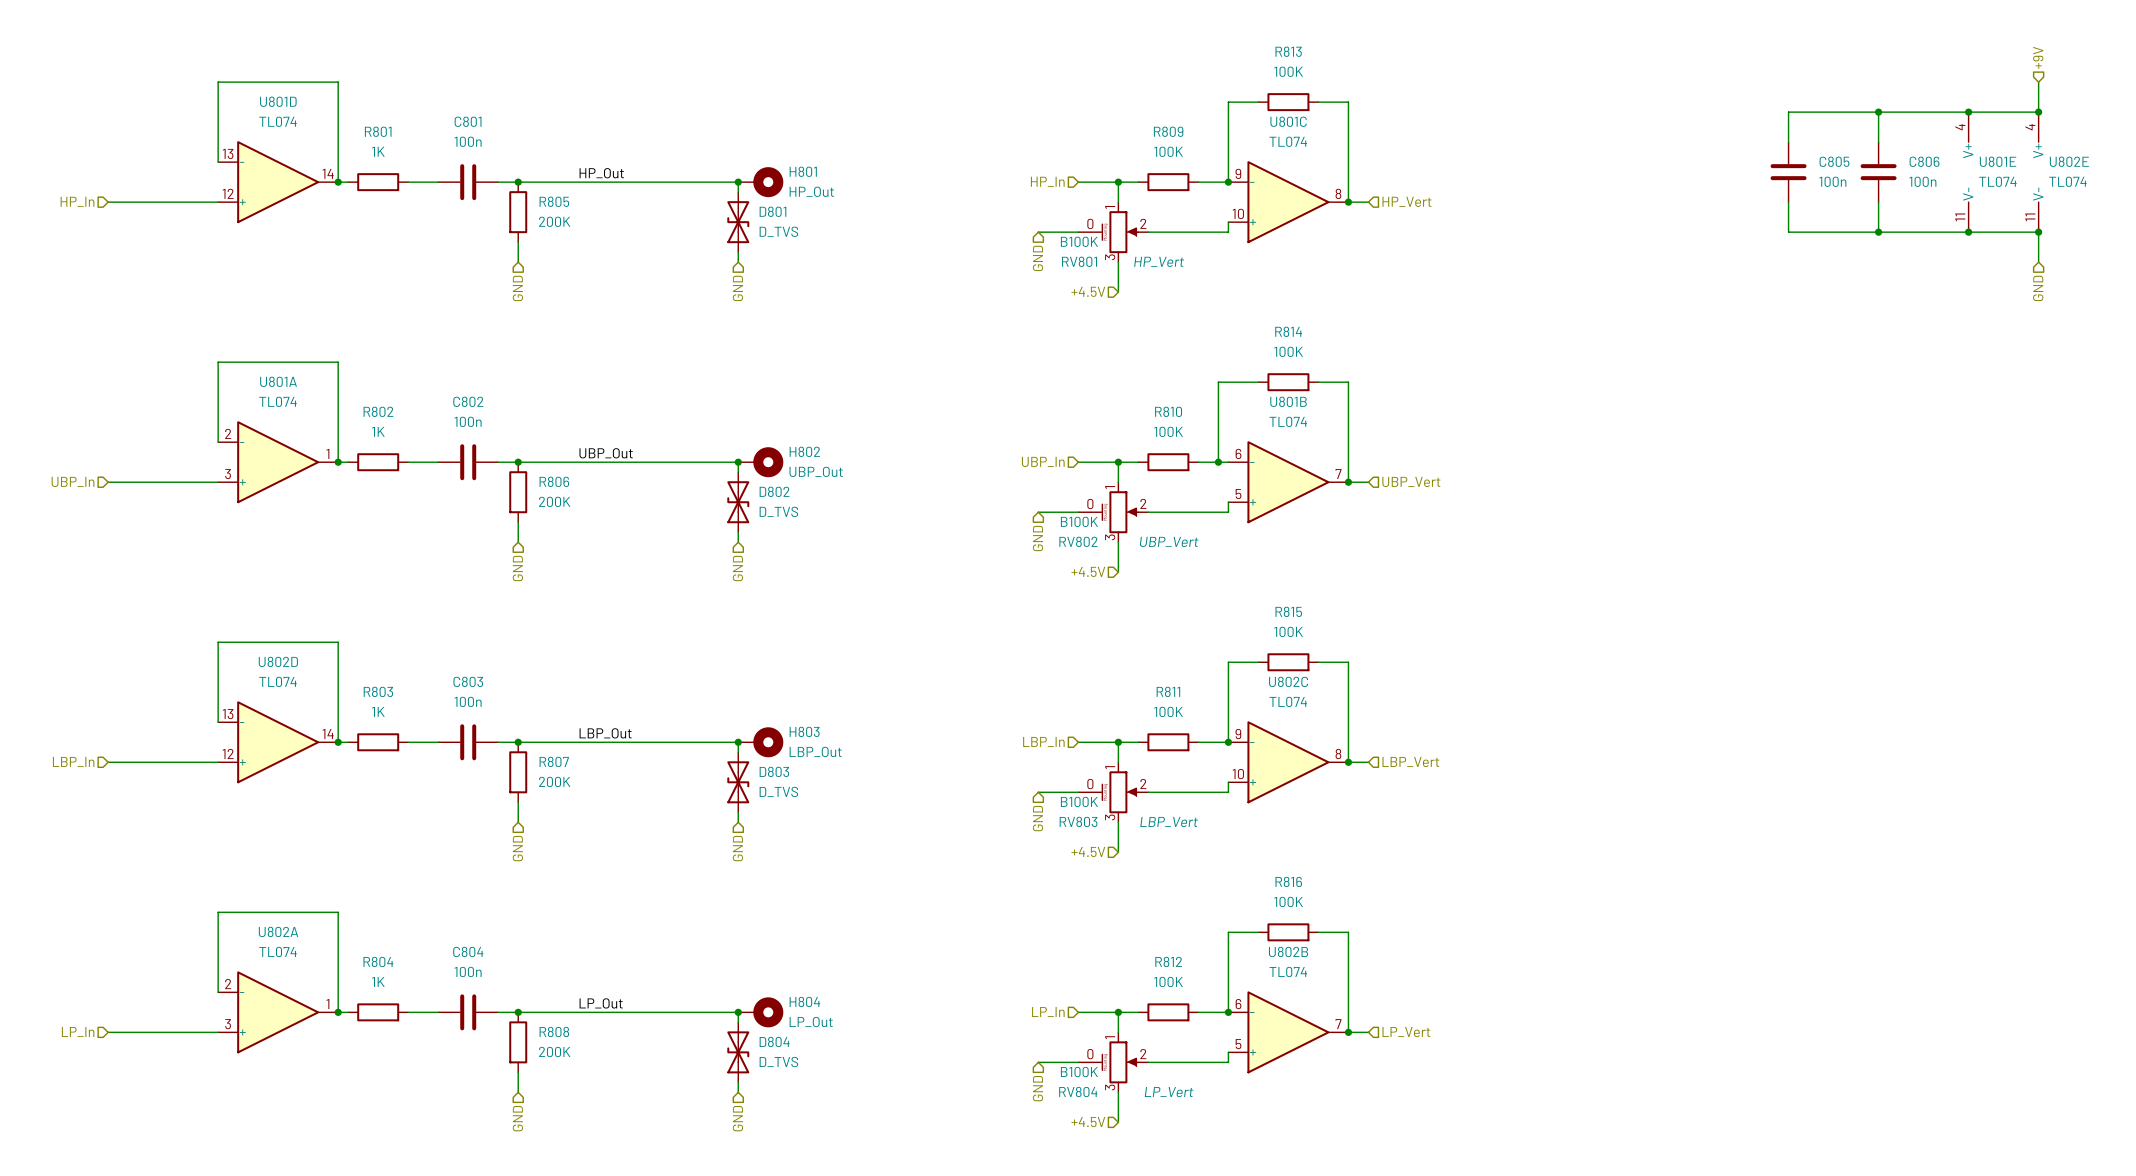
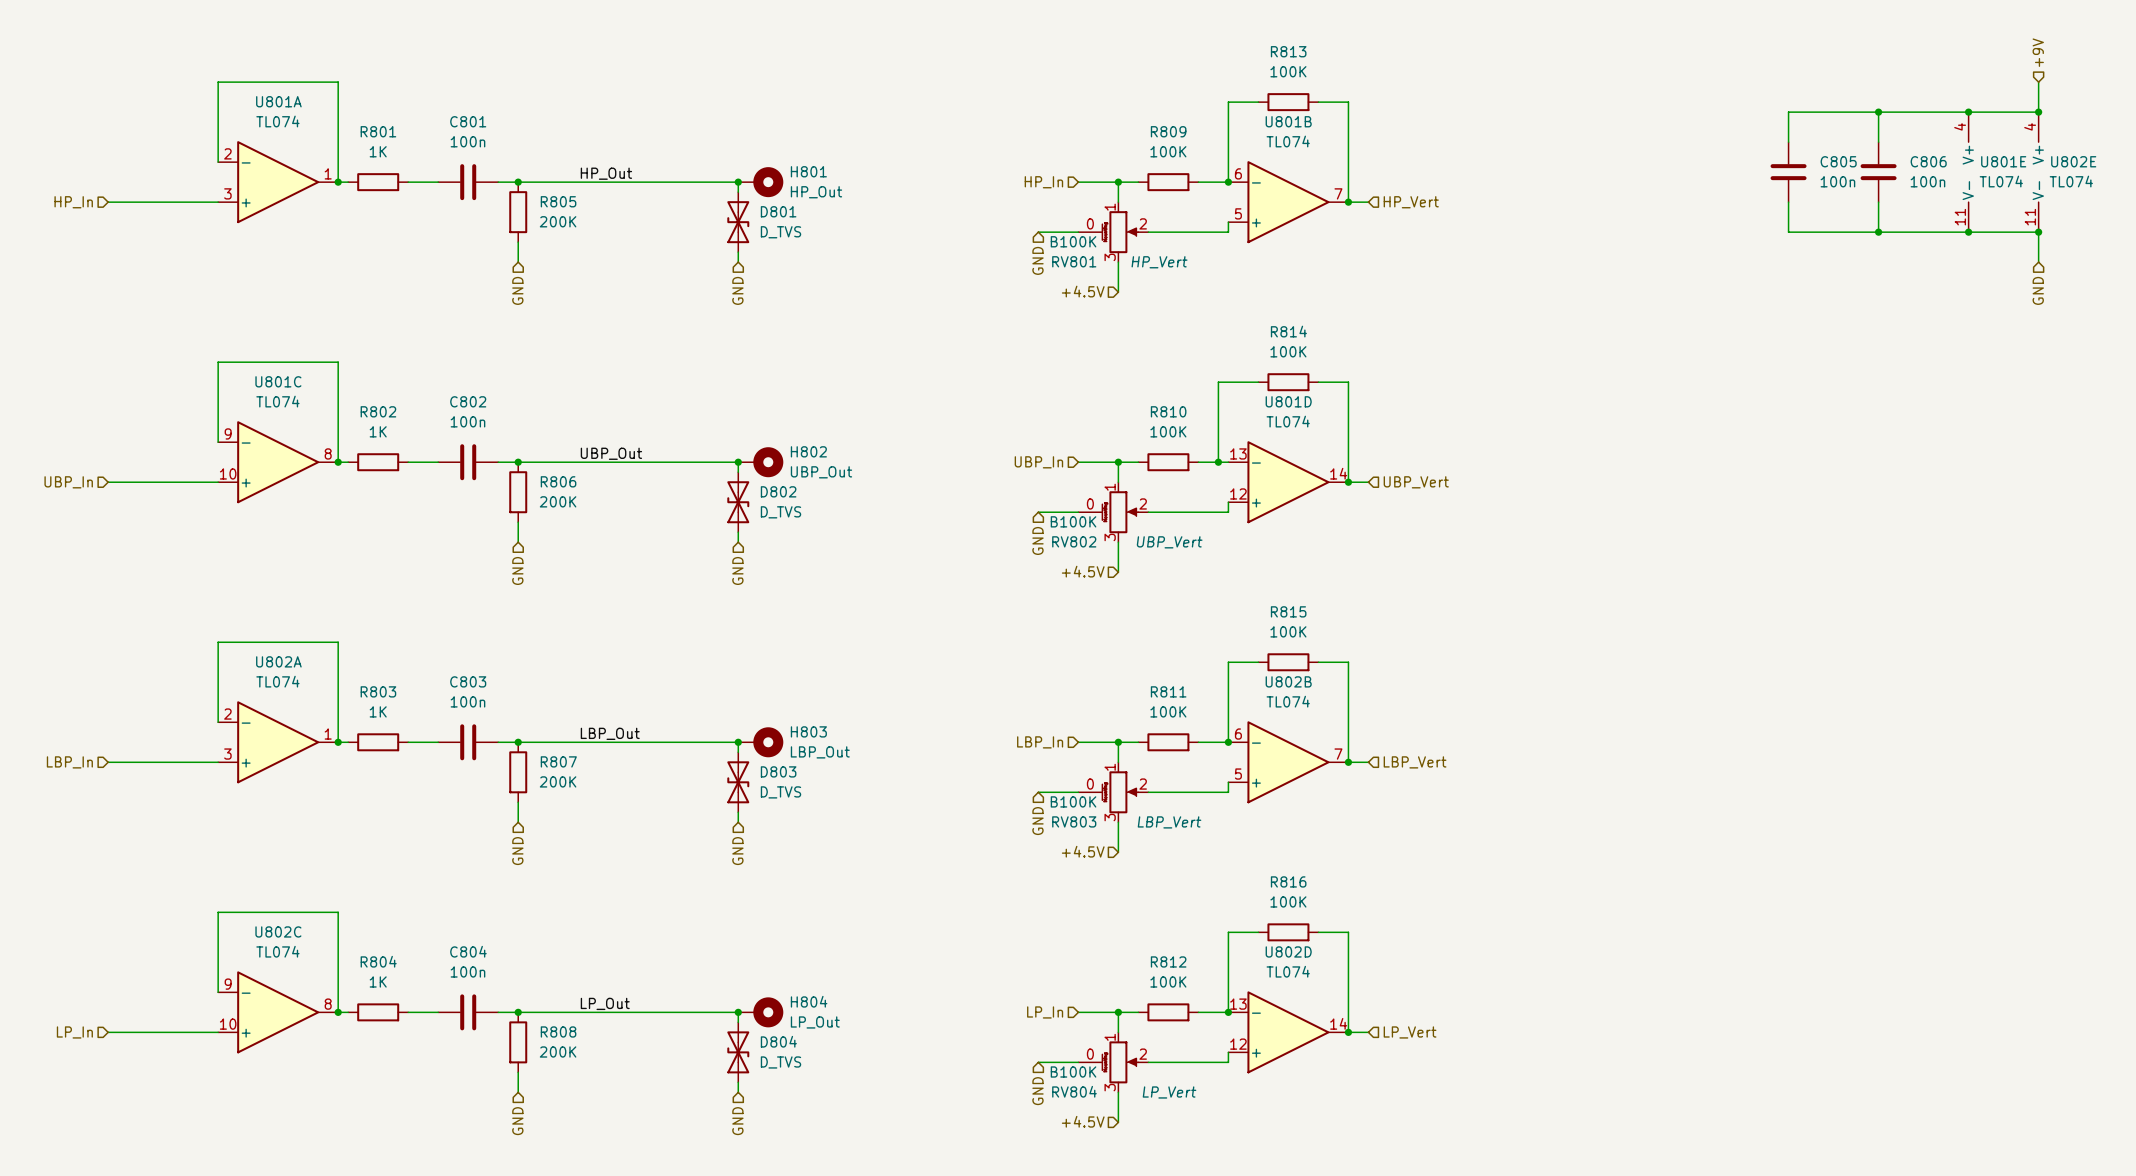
U801D position: (278, 182) -> (1288, 482)
U801C position: (1288, 202) -> (278, 462)
U801A position: (278, 462) -> (278, 182)
U801B position: (1288, 482) -> (1288, 202)
U802D position: (278, 742) -> (1288, 1032)
U802C position: (1288, 762) -> (278, 1012)
U802A position: (278, 1012) -> (278, 742)
U802B position: (1288, 1032) -> (1288, 762)

